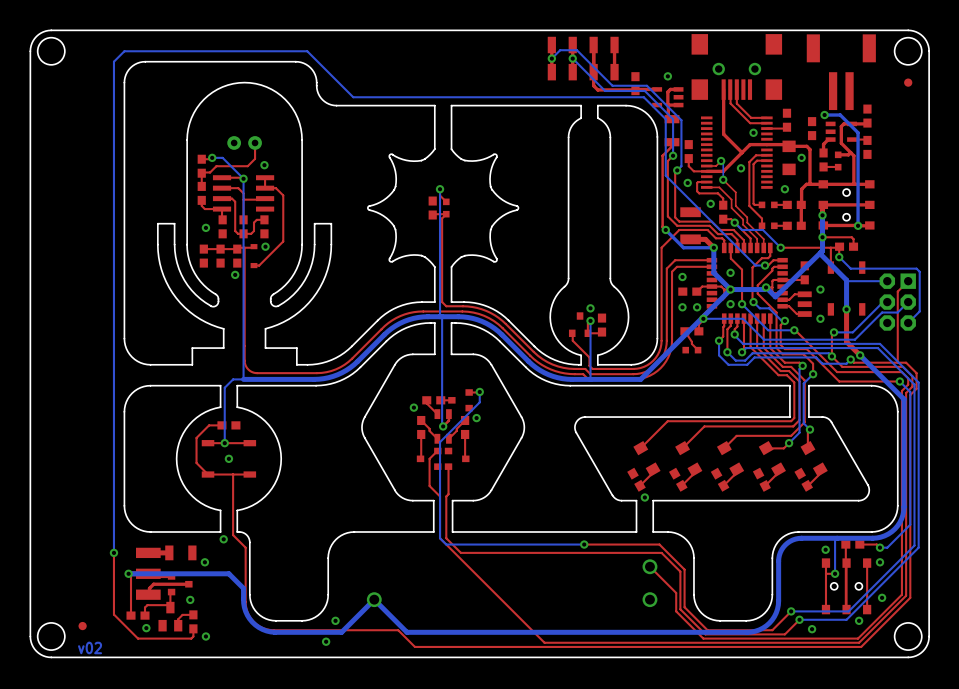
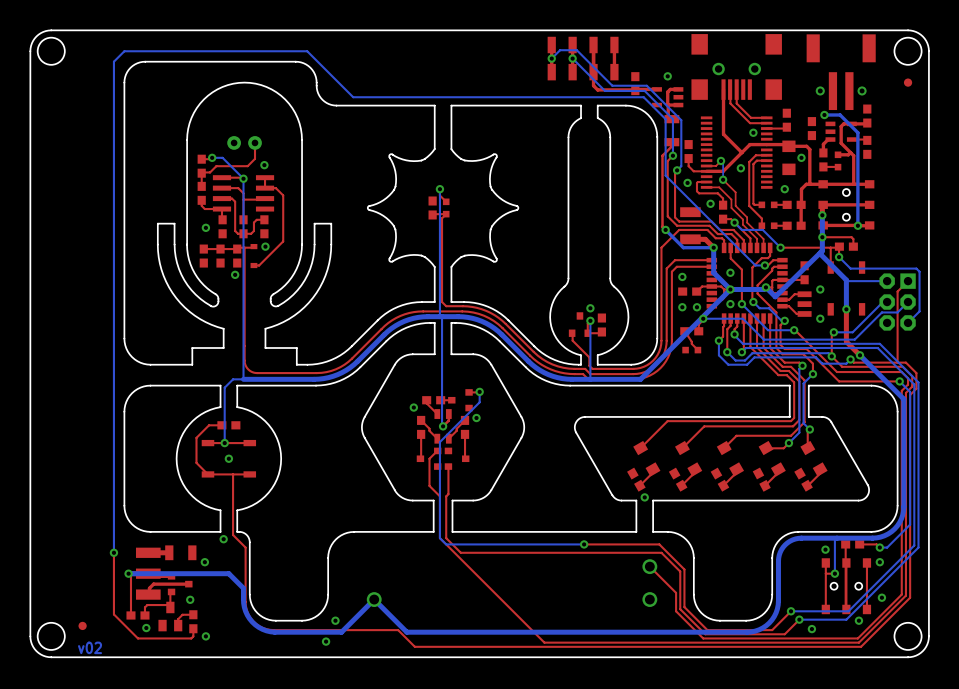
via: none -> (820, 90)
via: none -> (862, 90)

